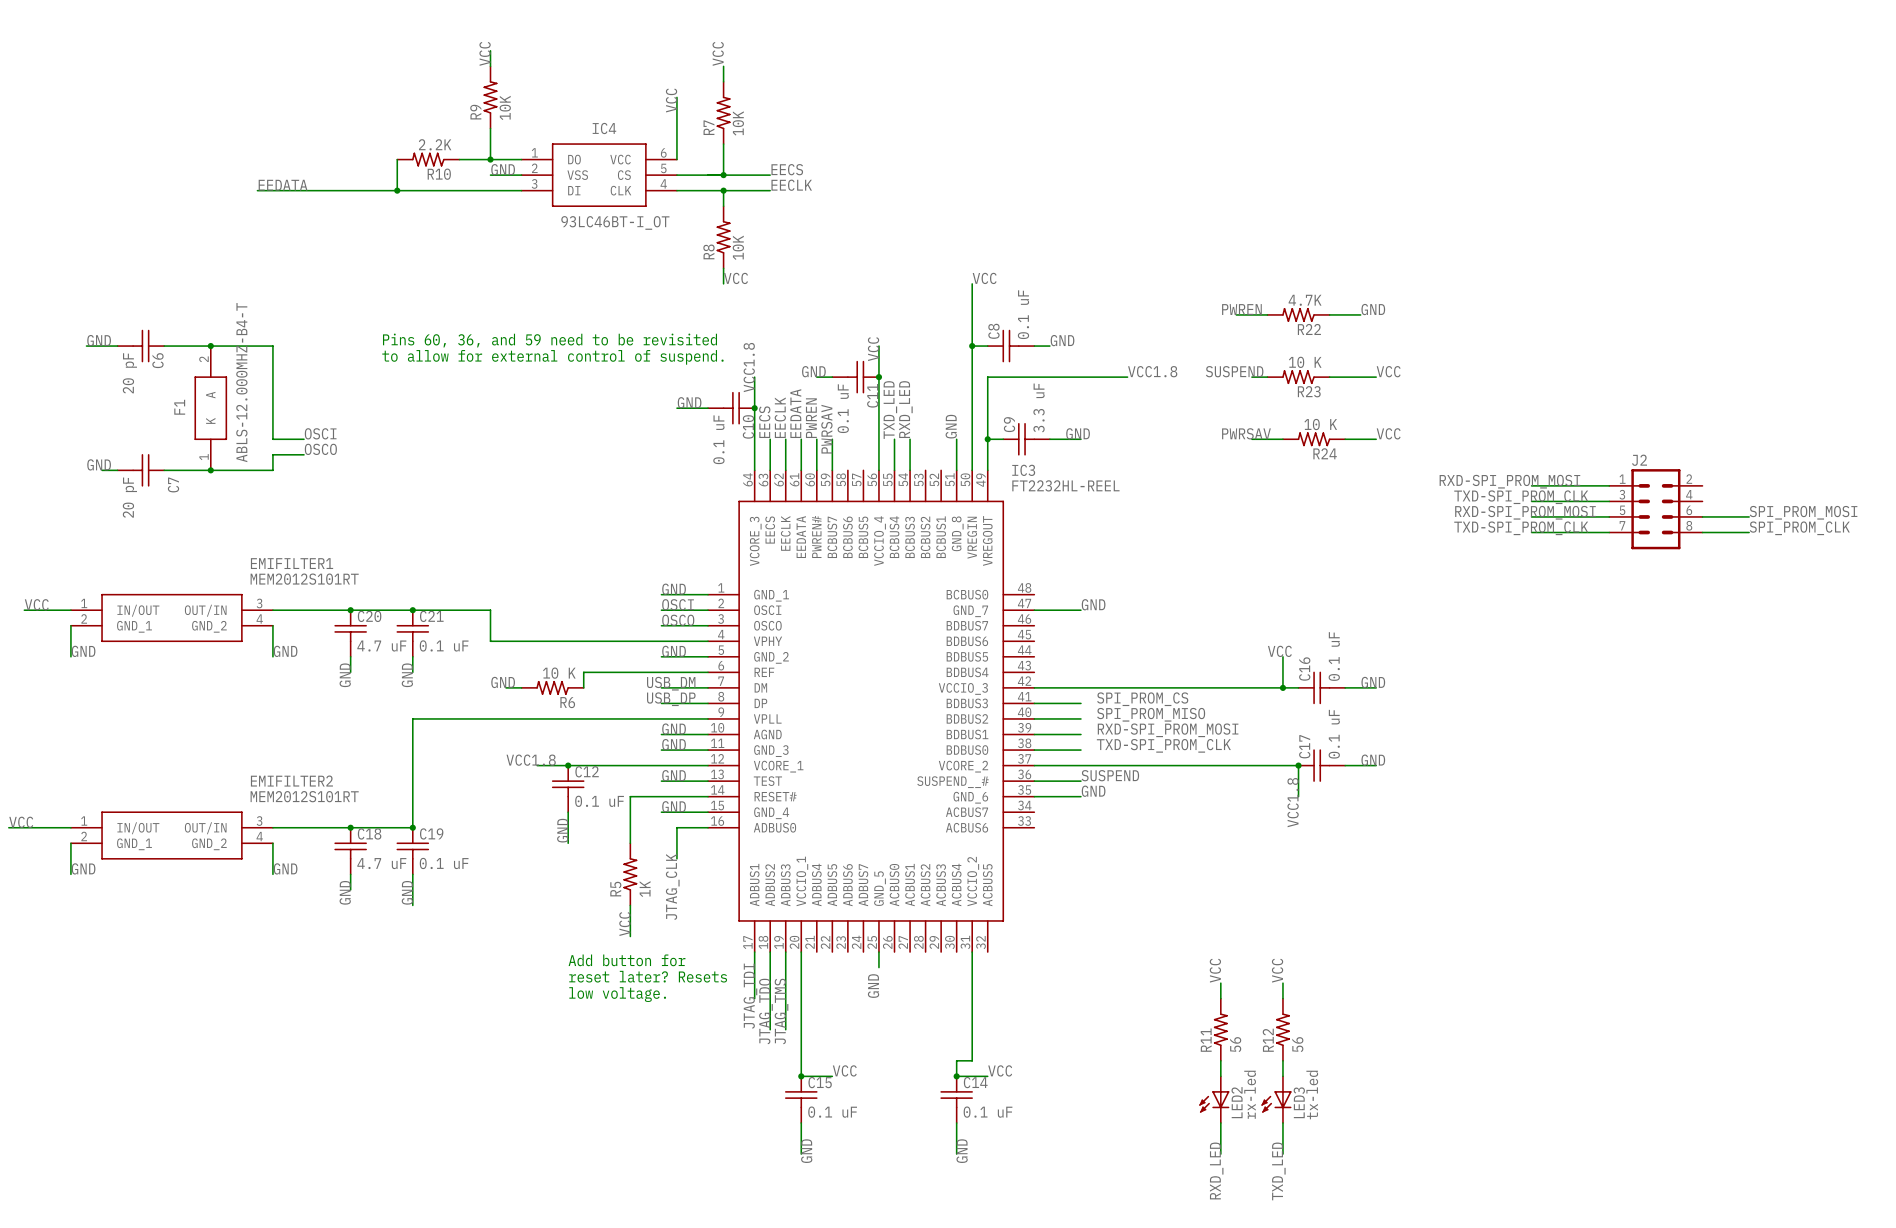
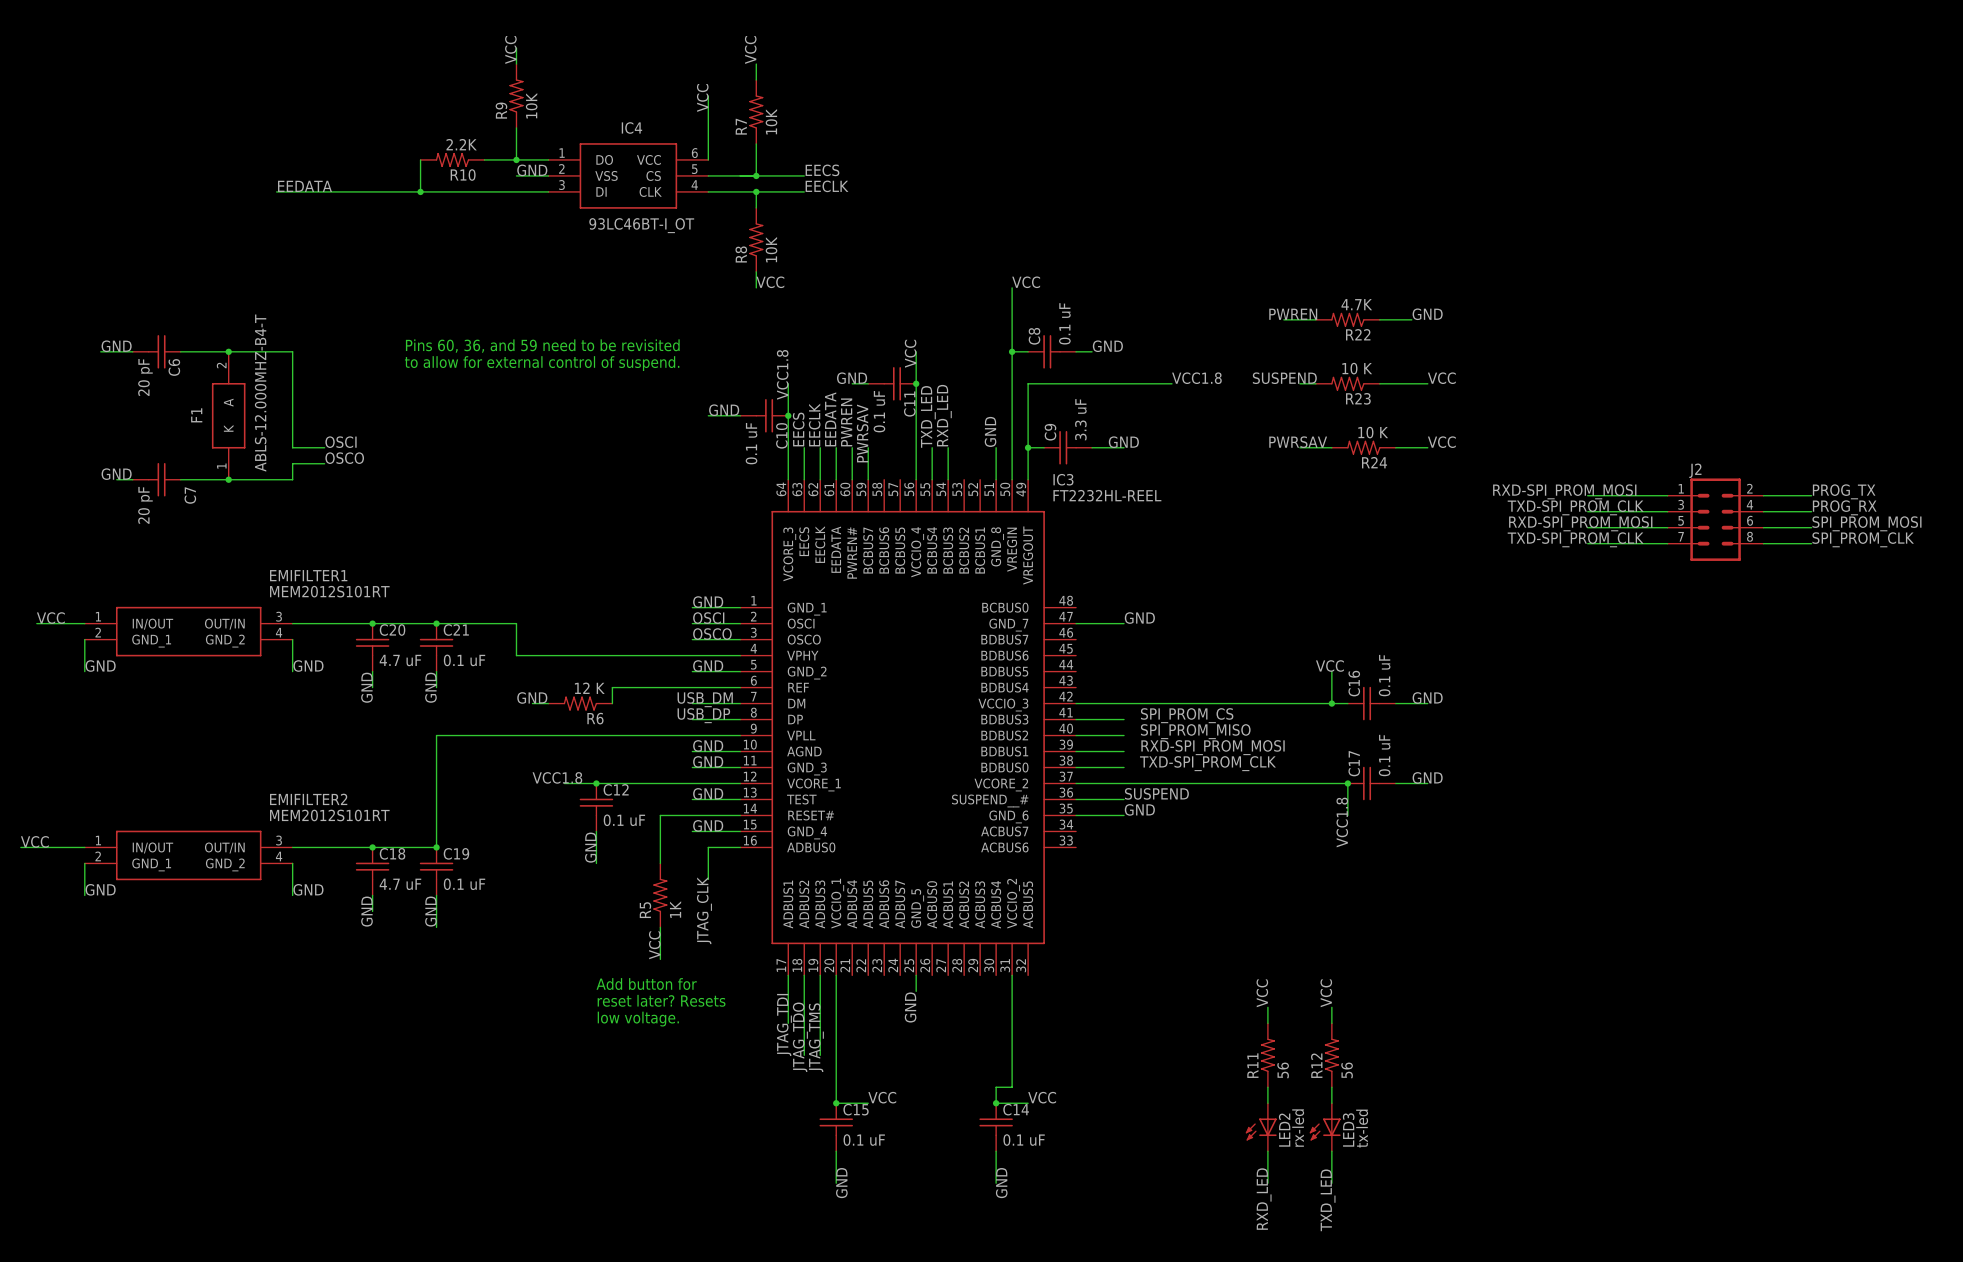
label: none -> PROG_TX (1844, 491)
wire: none -> (1763, 495) (1811, 495)
label: none -> PROG_RX (1844, 507)
wire: none -> (1763, 511) (1811, 511)
R6 value: 10 K (559, 673) -> 12 K (589, 688)

